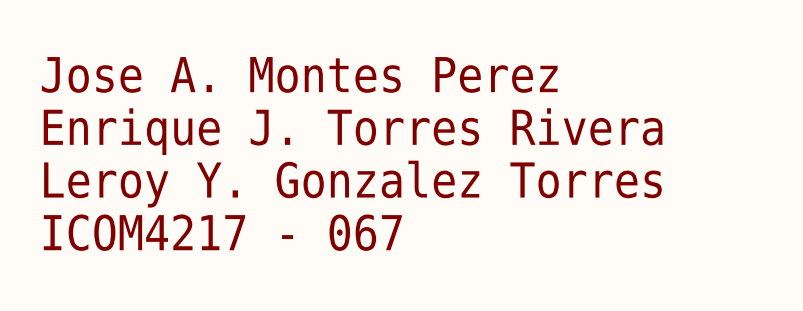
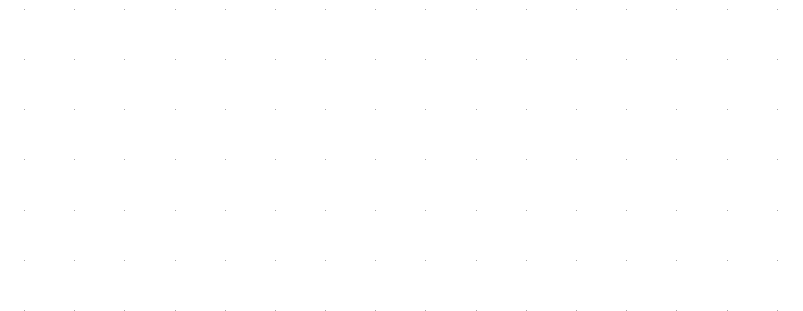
text: Jose A. Montes Perez (299, 74) -> none
text: Enrique J. Torres Rivera (353, 131) -> none
text: Leroy Y. Gonzalez Torres (352, 184) -> none
text: ICOM4217 - 067 (222, 232) -> none

